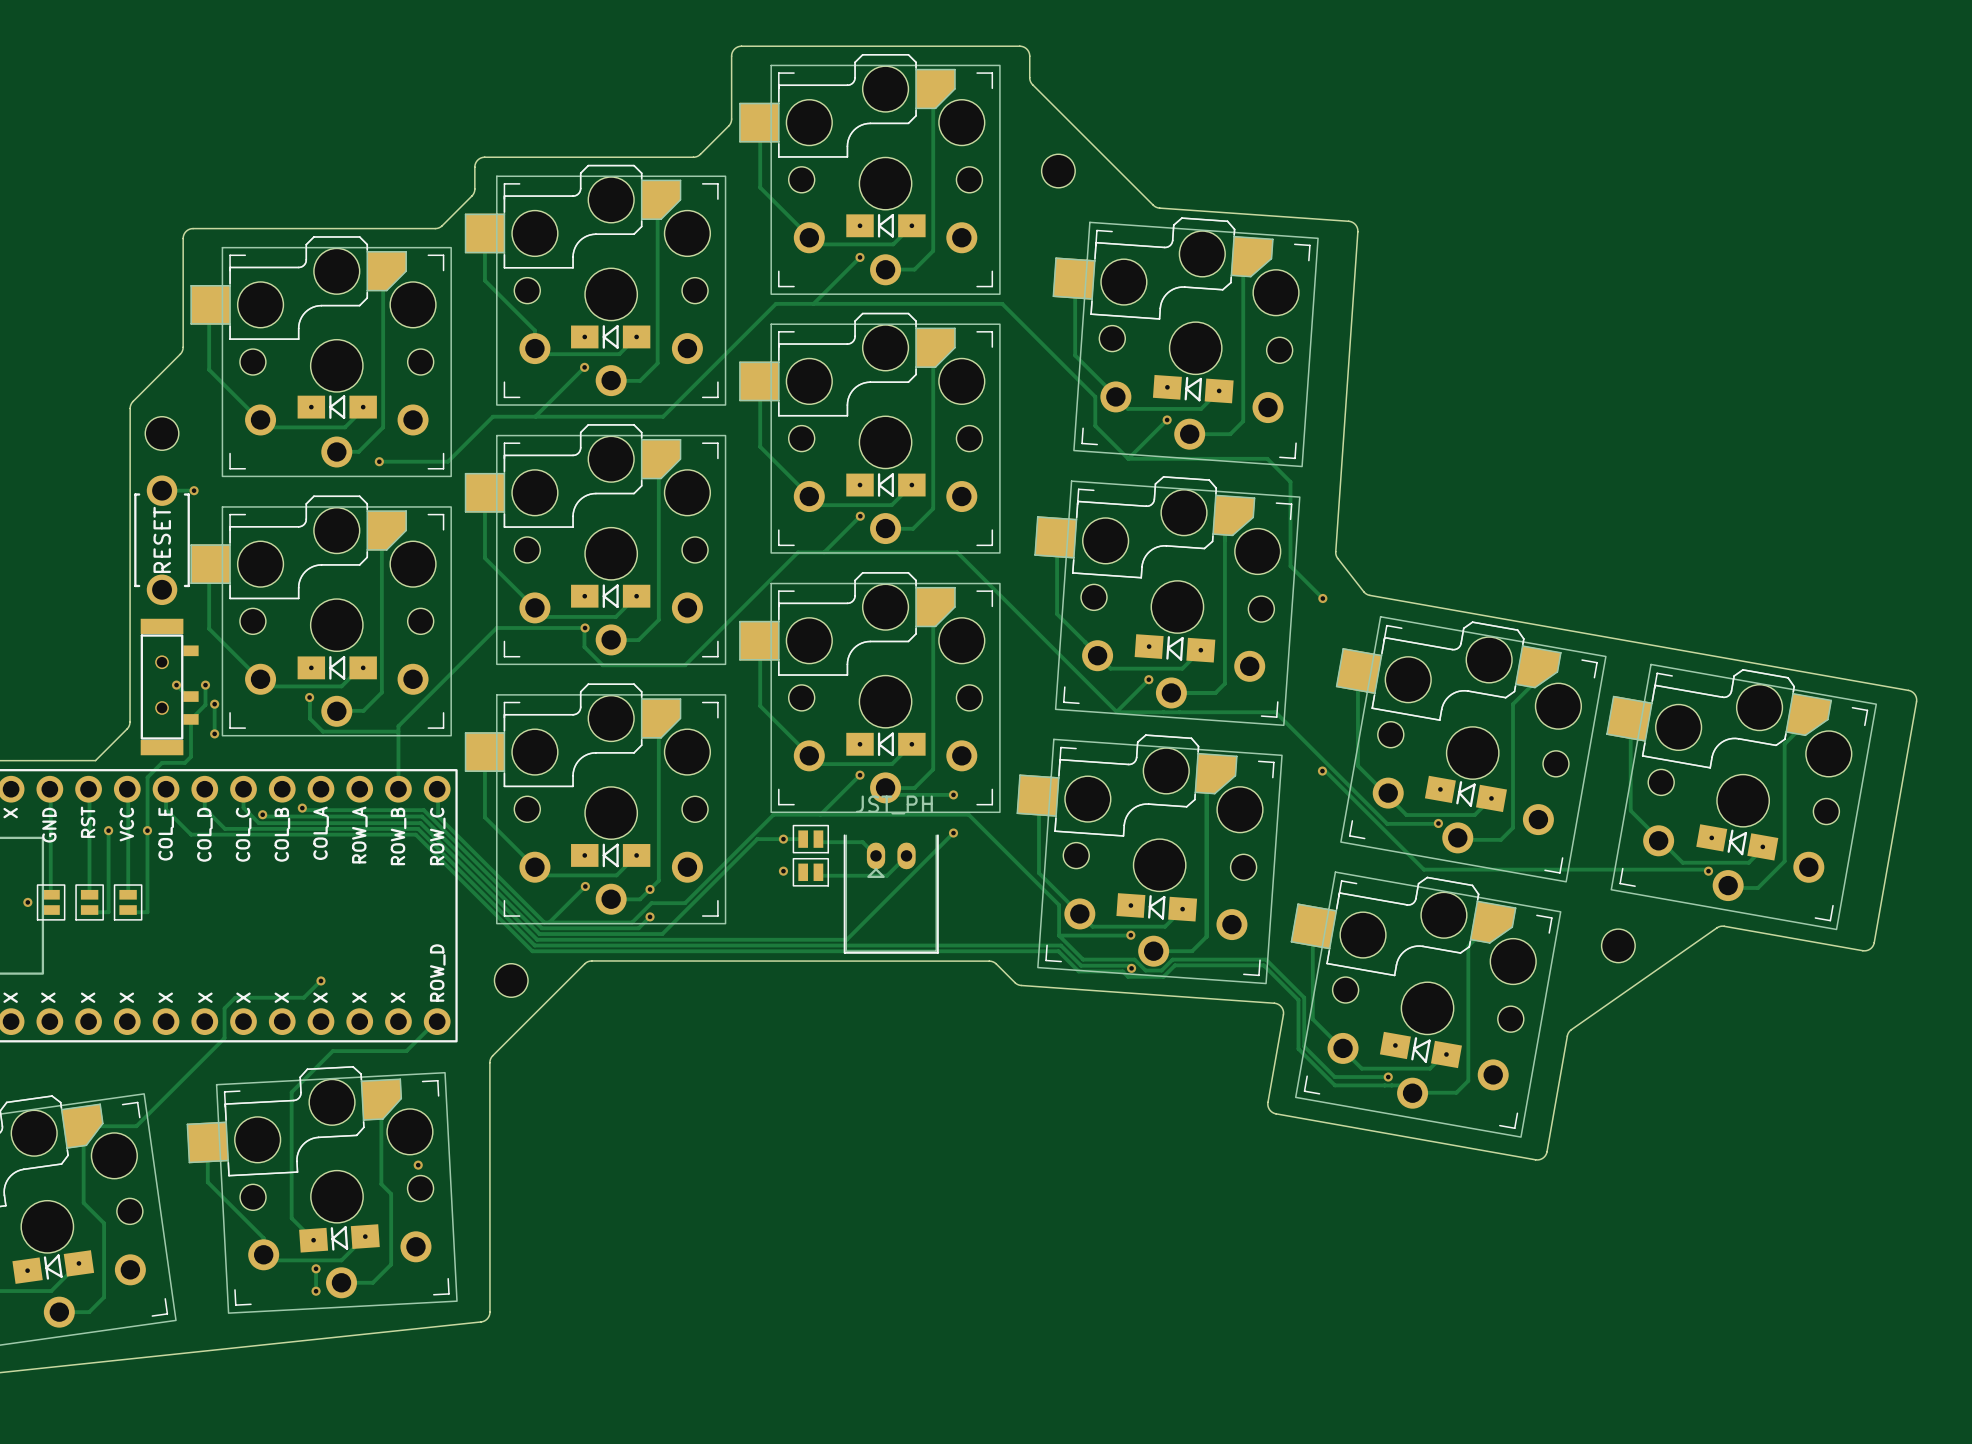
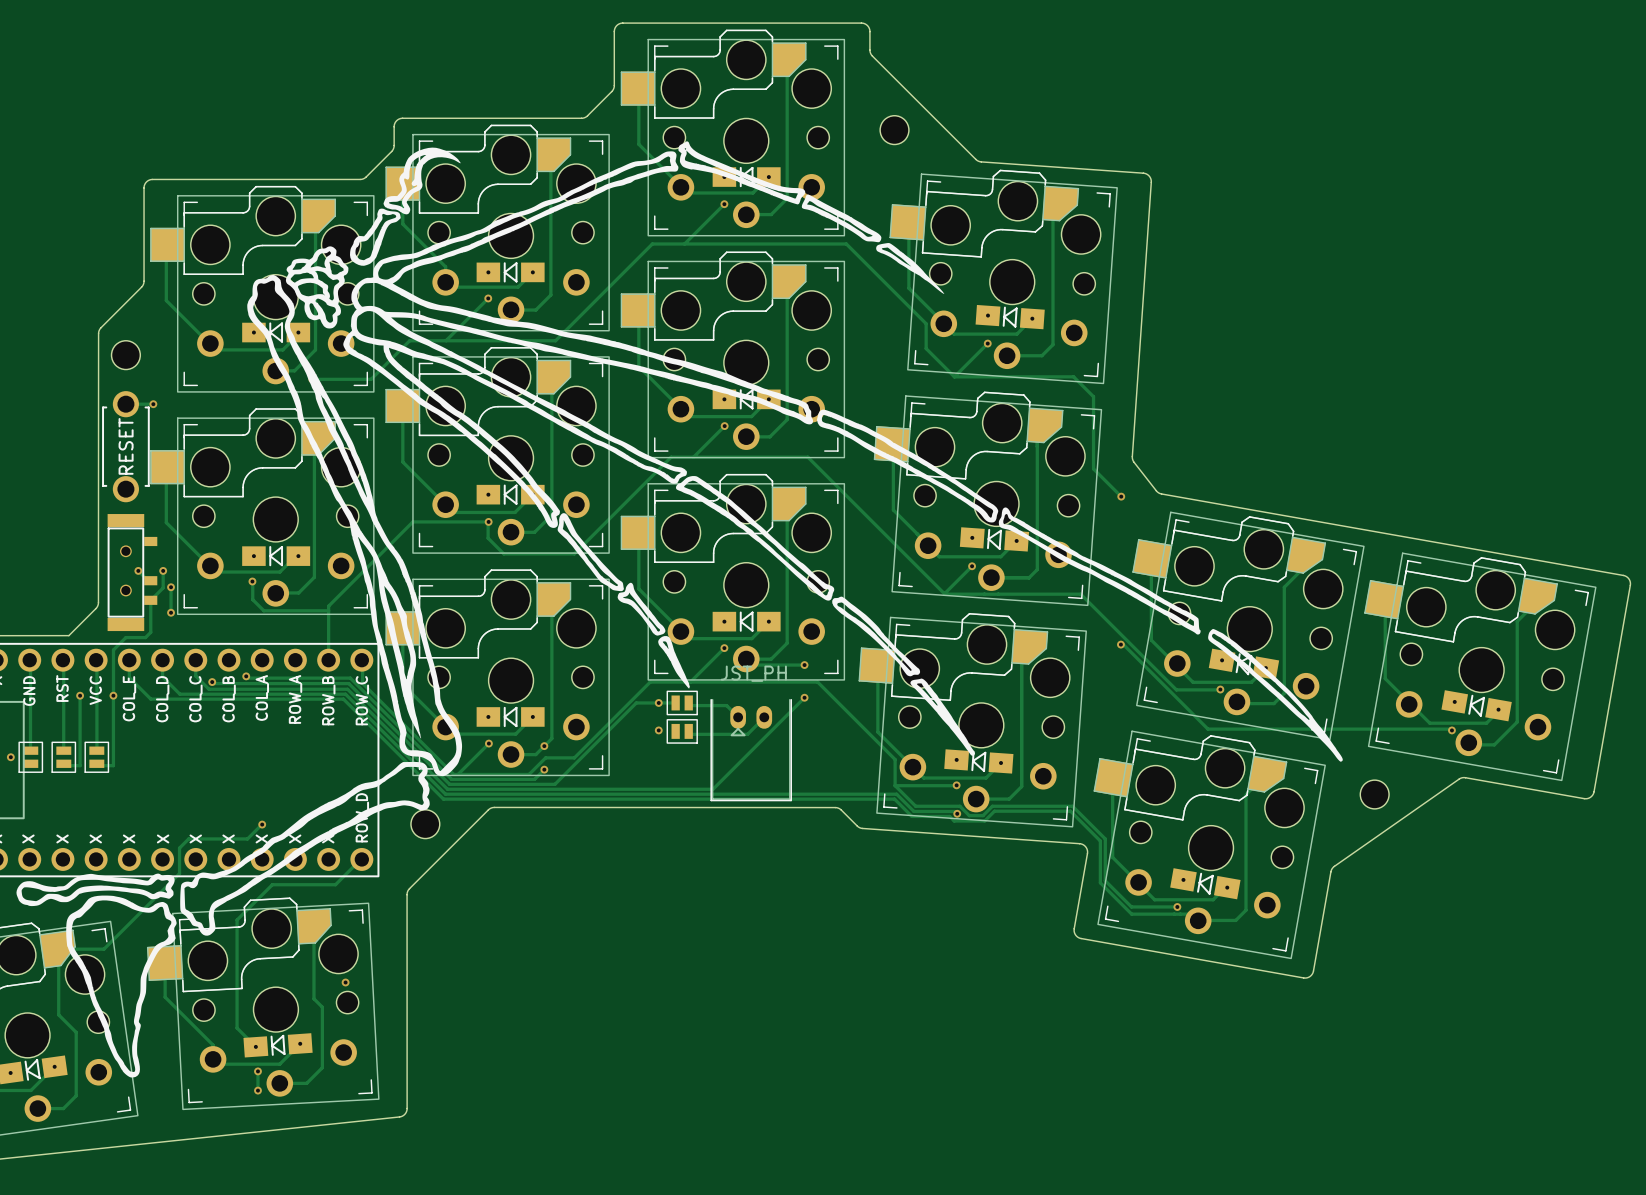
drawing: none -> [16, 141, 1343, 1078]

